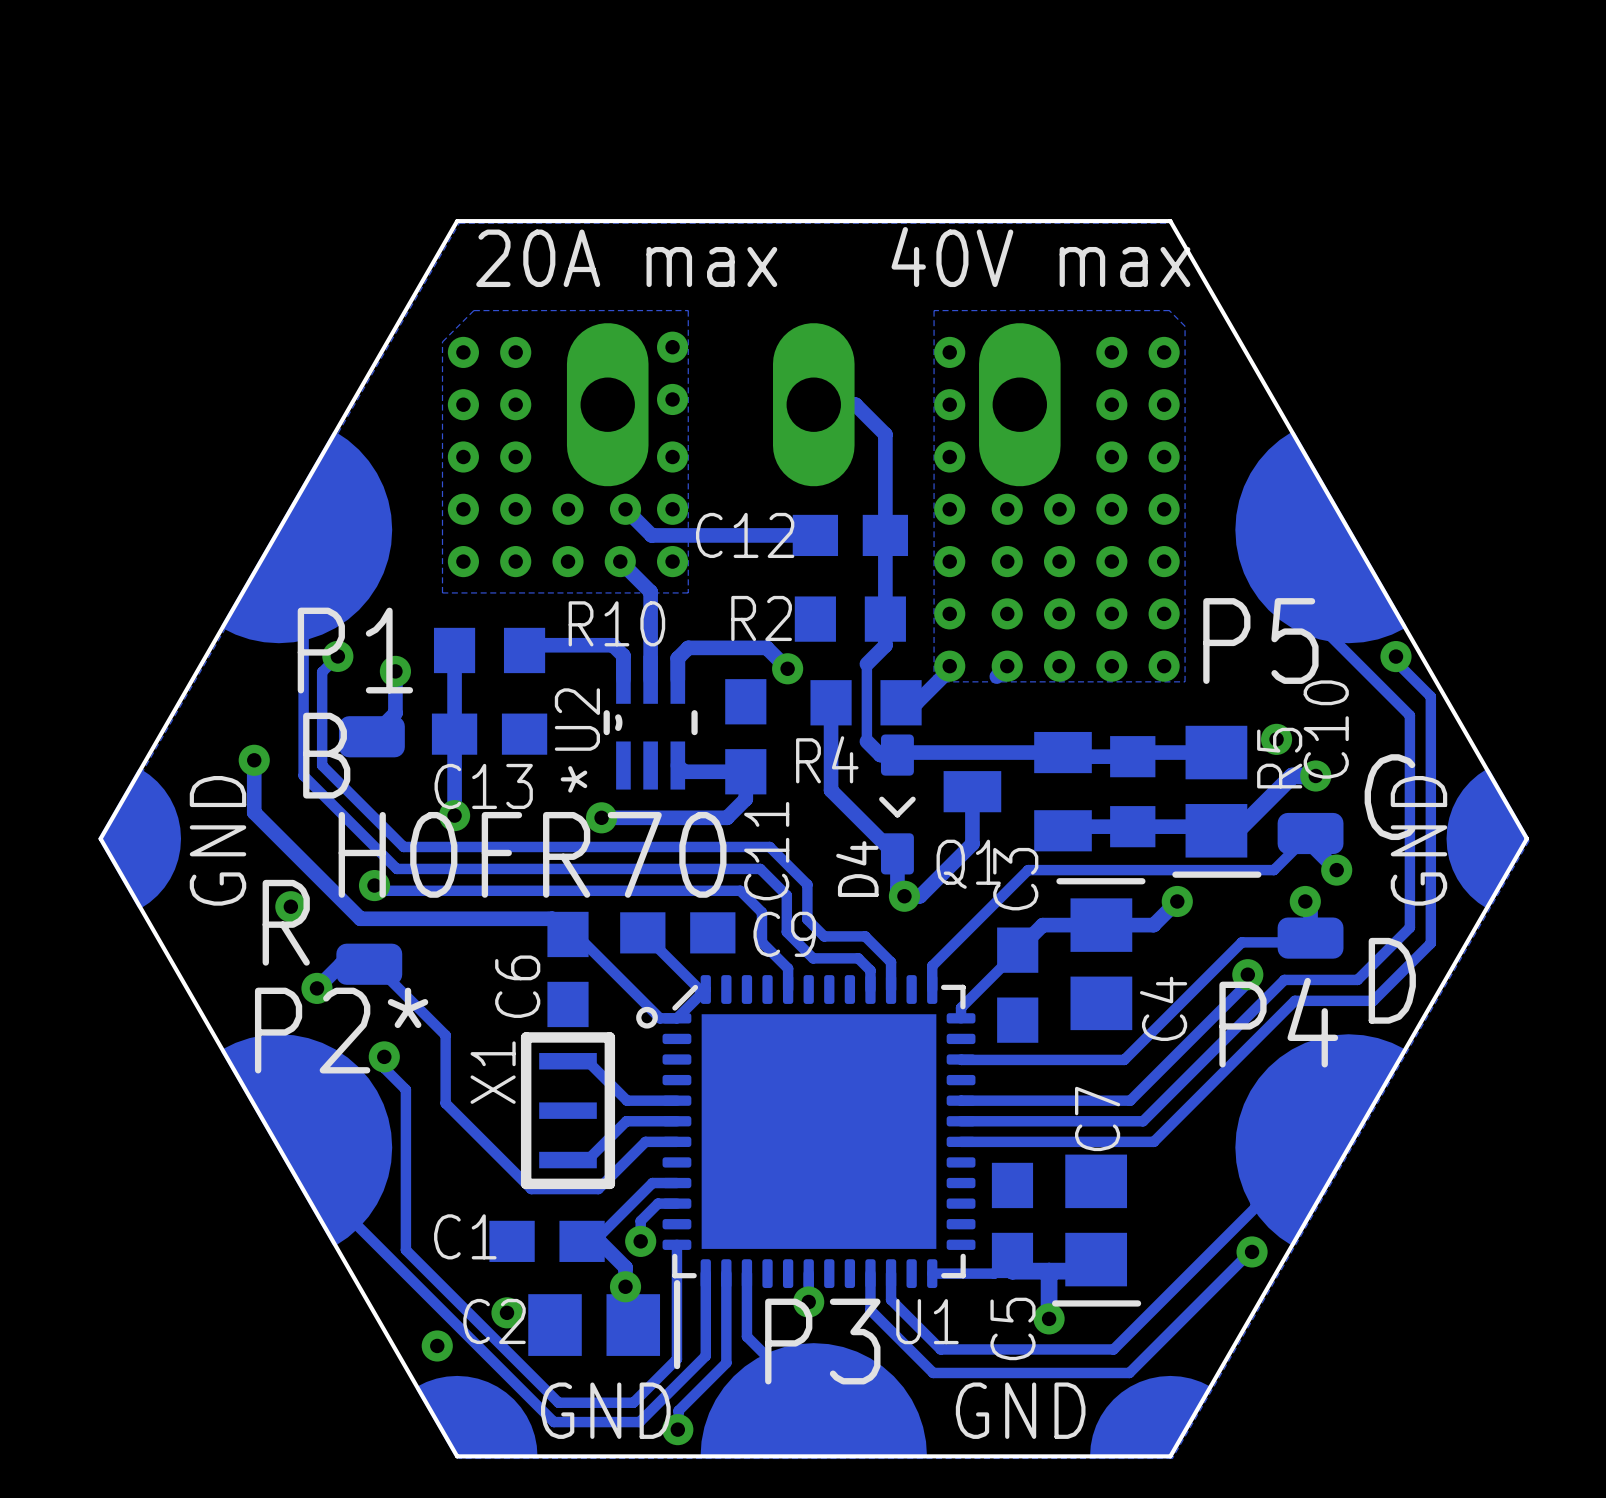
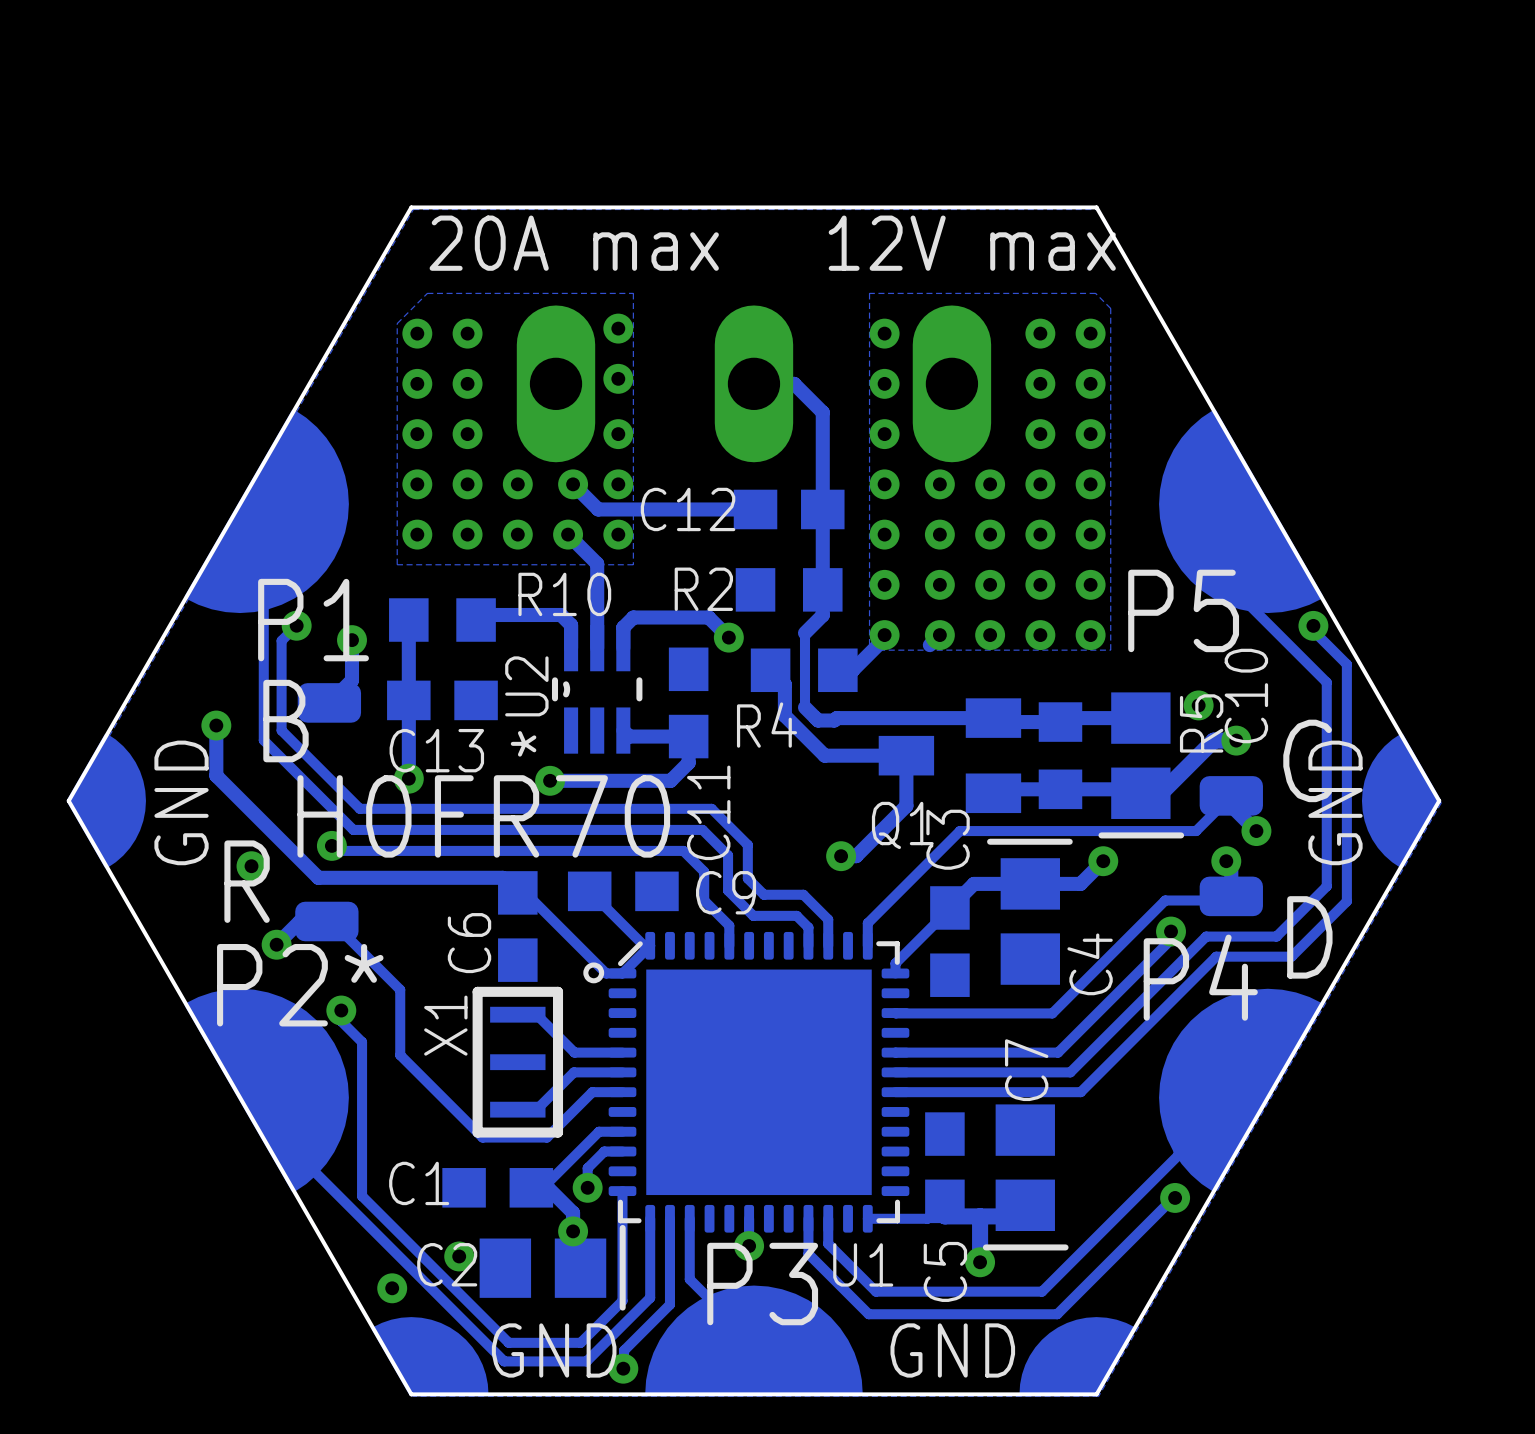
text: 40V max (1040, 257) -> 12V max (972, 243)
track: (831, 702) (831, 790) (894, 853) (897, 853) (897, 889) (904, 896) -> (770, 670) (784, 684) (784, 715) (824, 755) (906, 755)
D4: (897, 804) -> none

